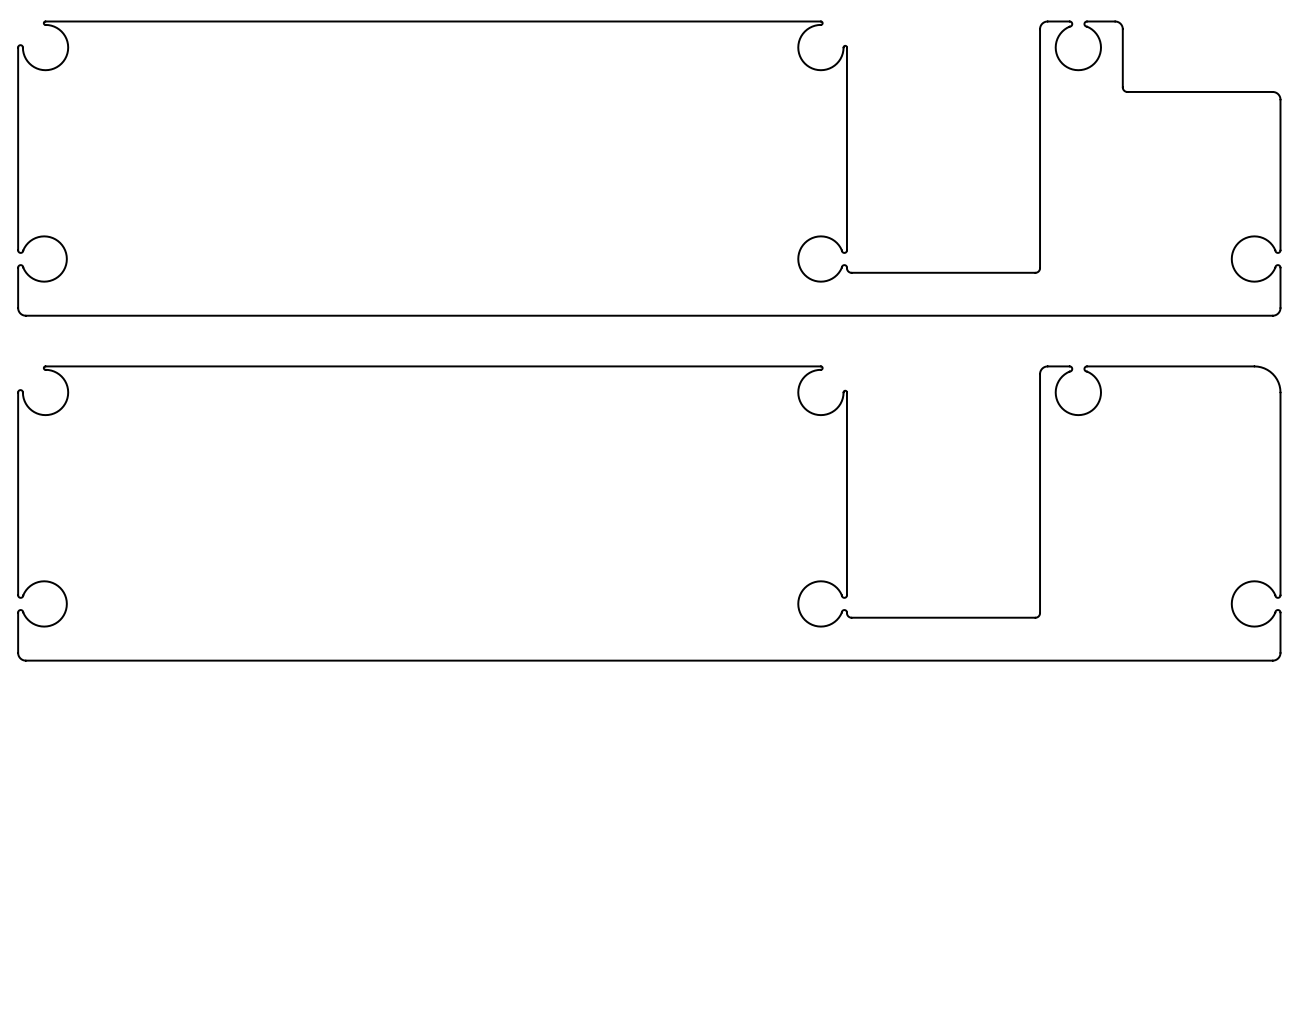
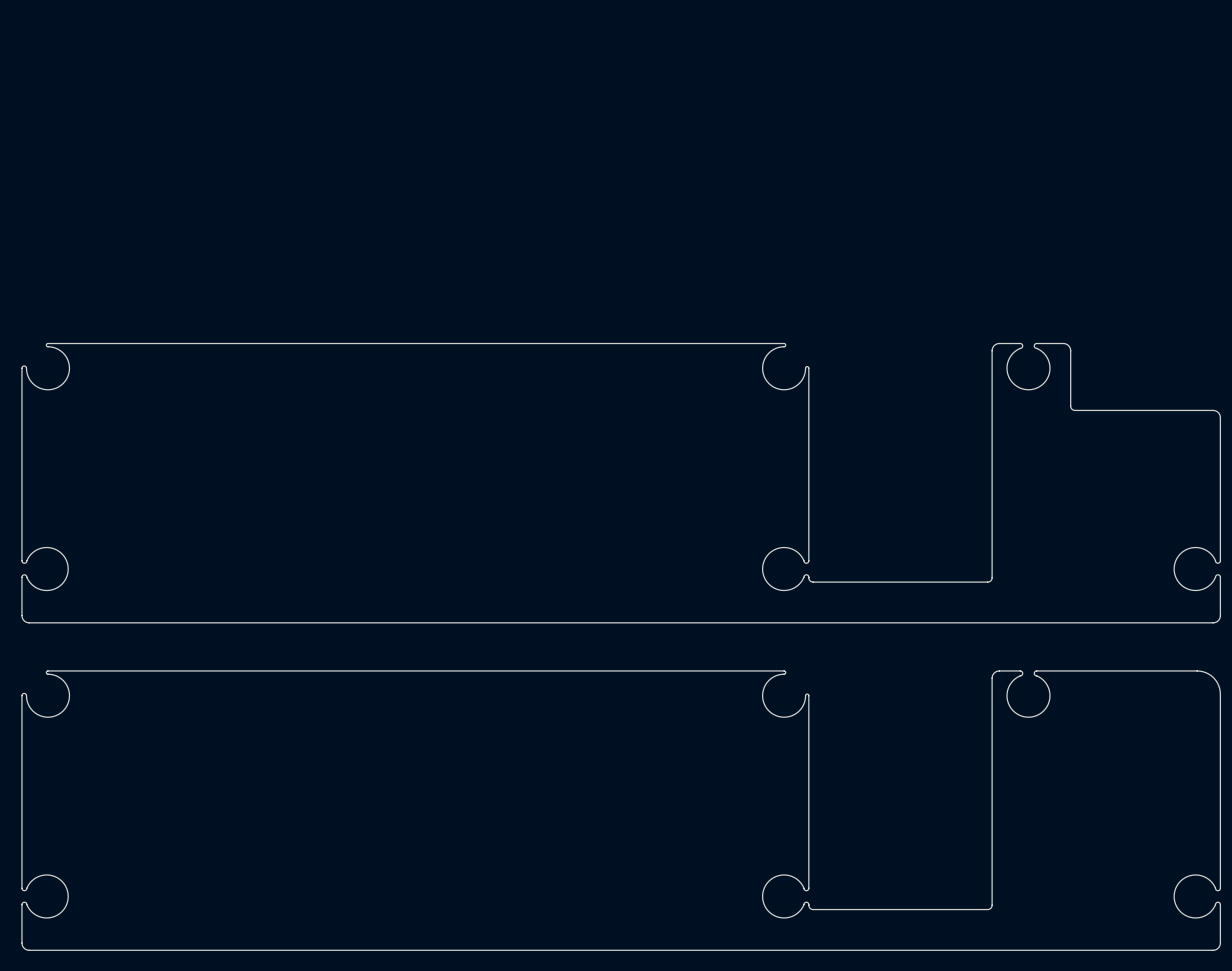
board edge: (45, 21) (821, 21) (821, 24) (812, 26) (802, 33) (799, 41) (798, 50) (801, 58) (807, 65) (815, 69) (823, 70) (836, 63) (841, 56) (843, 46) (846, 47) (846, 250) (843, 252) (834, 241) (823, 236) (812, 238) (802, 245) (798, 259) (801, 270) (809, 278) (820, 281) (834, 276) (844, 265) (851, 272) (1038, 271) (1040, 27) (1046, 21) (1071, 22) (1071, 25) (1062, 31) (1057, 38) (1056, 53) (1060, 61) (1067, 67) (1081, 70) (1094, 63) (1100, 50) (1097, 36) (1085, 25) (1084, 22) (1117, 21) (1122, 28) (1122, 87) (1125, 91) (1272, 91) (1279, 95) (1280, 251) (1276, 252) (1265, 239) (1251, 236) (1238, 243) (1233, 250) (1231, 259) (1236, 272) (1243, 278) (1251, 281) (1265, 278) (1276, 265) (1279, 265) (1280, 310) (1277, 314) (1272, 315) (23, 315) (18, 309) (18, 266) (22, 265) (32, 278) (47, 281) (60, 275) (66, 261) (66, 253) (62, 245) (50, 237) (35, 238) (28, 243) (22, 252) (18, 250) (18, 46) (22, 46) (24, 56) (29, 63) (42, 70) (51, 69) (59, 65) (65, 58) (68, 50) (67, 41) (63, 33) (54, 26) (44, 24) (45, 21) -> none
board edge: (1115, 366) (1254, 366) (1264, 368) (1272, 374) (1279, 385) (1280, 444) -> (1063, 343) (1067, 345) (1070, 349) (1070, 406) (1073, 410) (1213, 410) (1218, 412) (1220, 417)
board edge: none -> (47, 670) (784, 671) (784, 673) (775, 675) (767, 682) (763, 690) (762, 698) (765, 706) (771, 712) (778, 716) (786, 717) (799, 710) (803, 703) (805, 694) (808, 695) (808, 888) (805, 890) (797, 879) (786, 875) (775, 876) (767, 883) (762, 896) (765, 907) (773, 915) (784, 917) (797, 913) (806, 902) (813, 909) (987, 909) (991, 907) (992, 678) (995, 671) (1022, 671) (1021, 675) (1009, 684) (1007, 698) (1009, 706) (1015, 712) (1028, 717) (1036, 715) (1043, 710) (1049, 698) (1047, 684) (1034, 674) (1036, 671) (1203, 671) (1213, 677) (1220, 691) (1220, 888) (1216, 890) (1210, 881) (1203, 876) (1192, 875) (1180, 881) (1175, 888) (1174, 896) (1178, 909) (1184, 915) (1192, 917) (1206, 915) (1216, 902) (1219, 903) (1220, 944) (1217, 948) (1213, 950) (27, 950) (22, 943) (22, 903) (26, 902) (35, 915) (49, 917) (61, 911) (68, 899) (67, 890) (63, 883) (52, 875) (38, 876) (31, 881) (25, 890) (21, 888) (22, 695) (26, 694) (28, 703) (32, 710) (45, 717) (53, 716) (61, 712) (66, 706) (69, 698) (68, 690) (65, 682) (56, 675) (47, 673) (47, 670)

